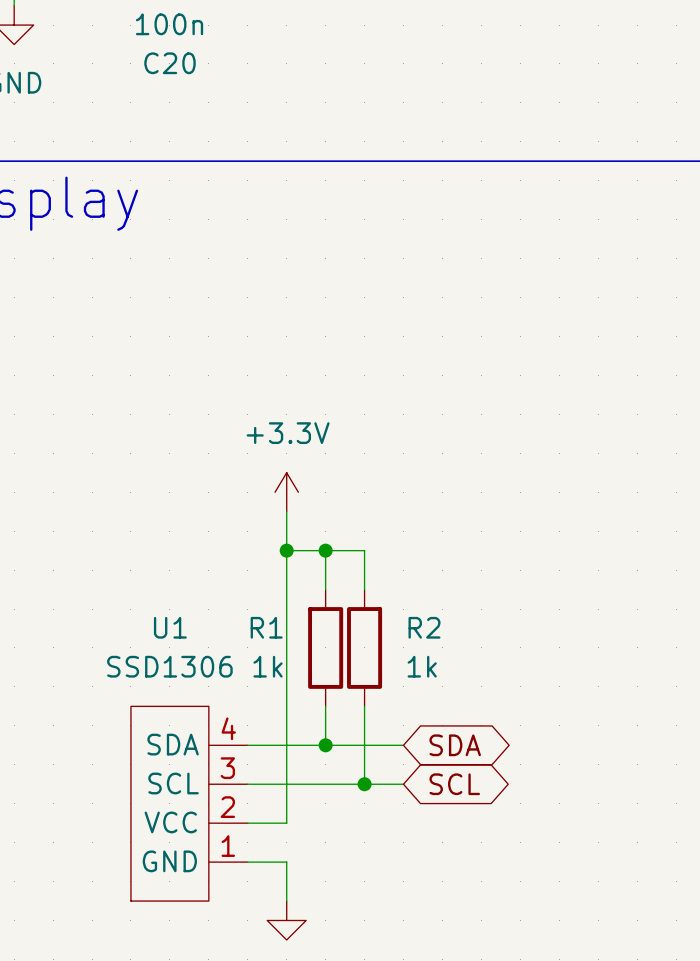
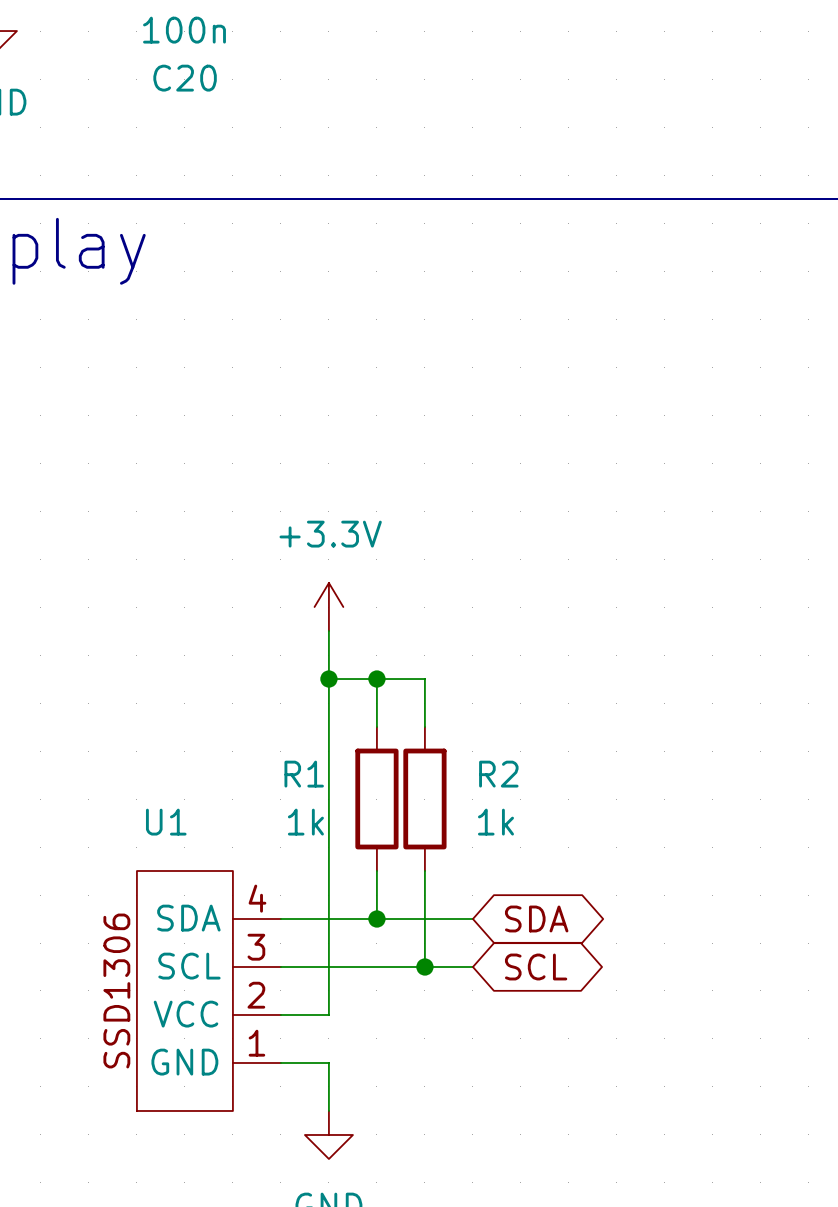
U1 name position: U1 (170, 627) -> U1 (166, 822)
U1 value: SSD1306 (169, 666) -> none
U1 text: none -> SSD1306 (116, 990)

